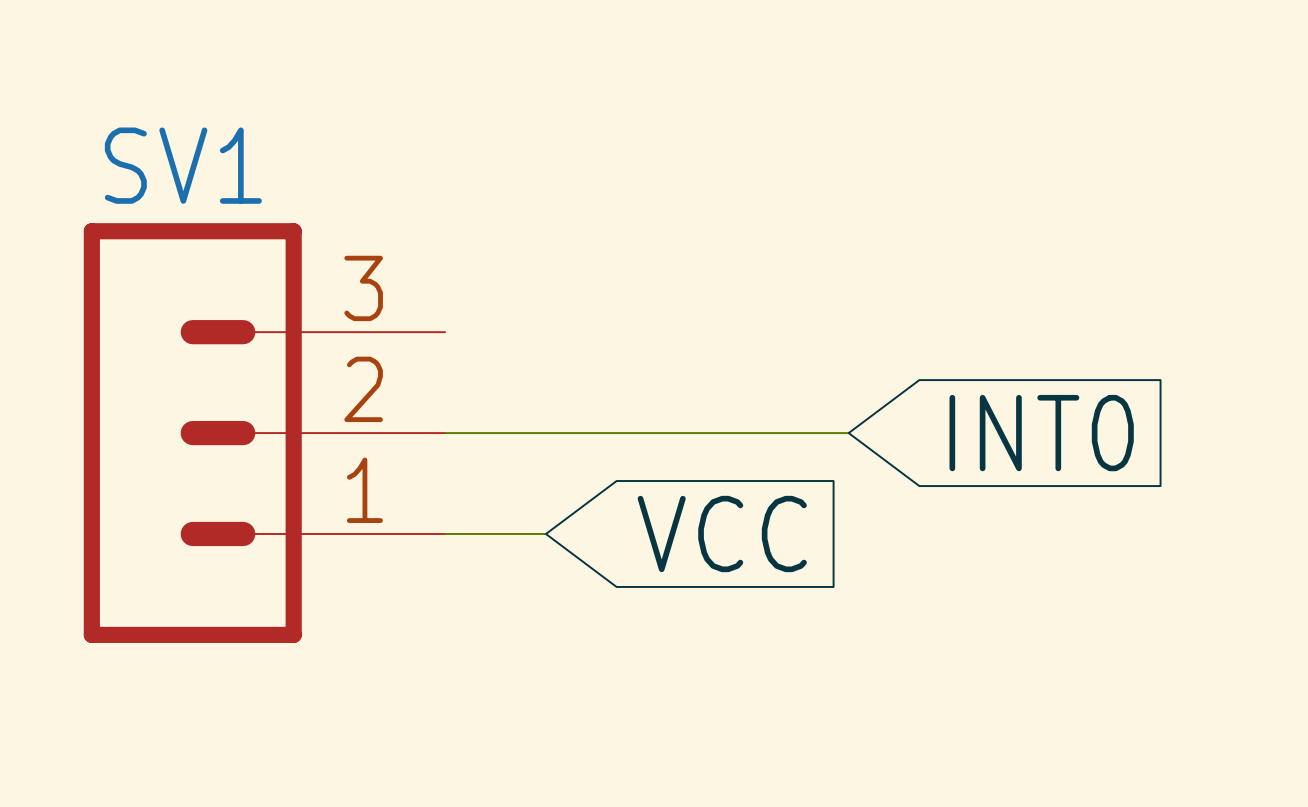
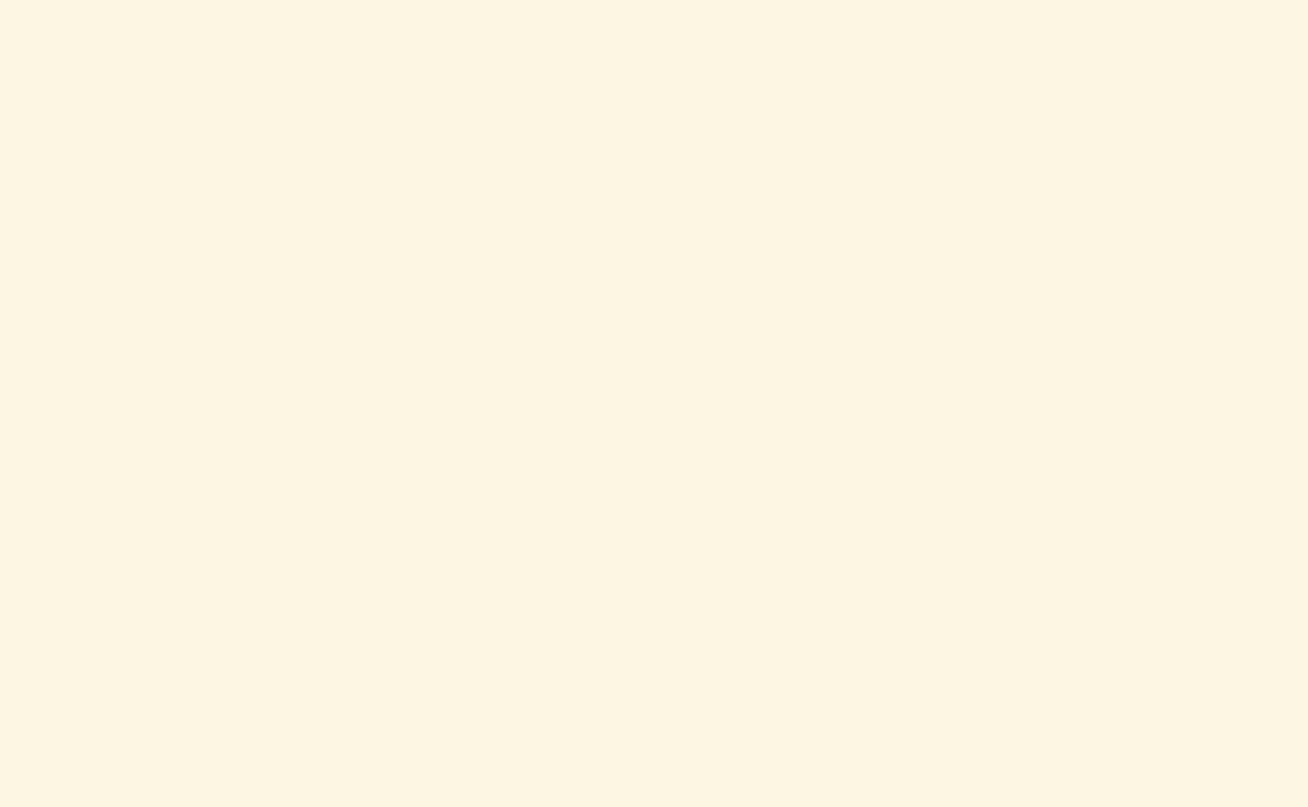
SV1: (264, 433) -> none
wire: (445, 433) (848, 433) -> none
global label: INT0 (1041, 433) -> none
wire: (445, 533) (545, 533) -> none
global label: VCC (722, 533) -> none

